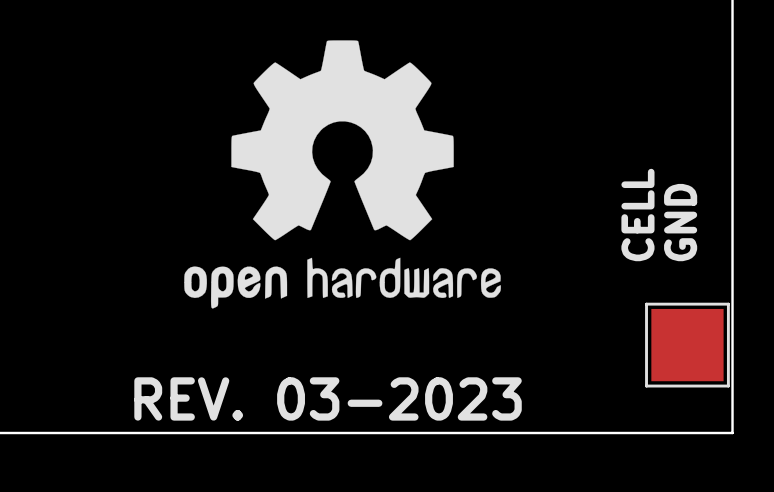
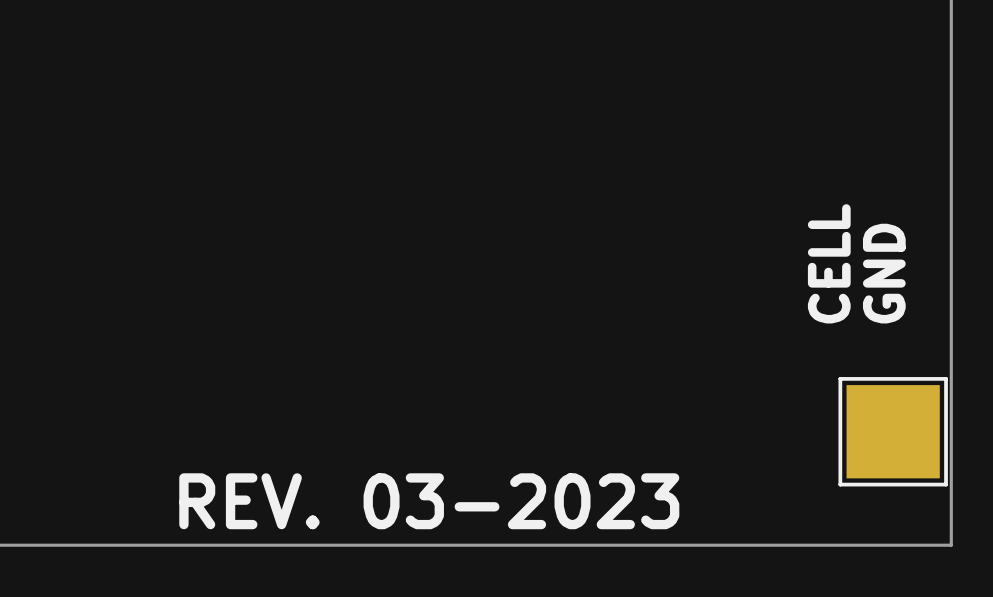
drawing: [184, 40, 501, 309] -> none

